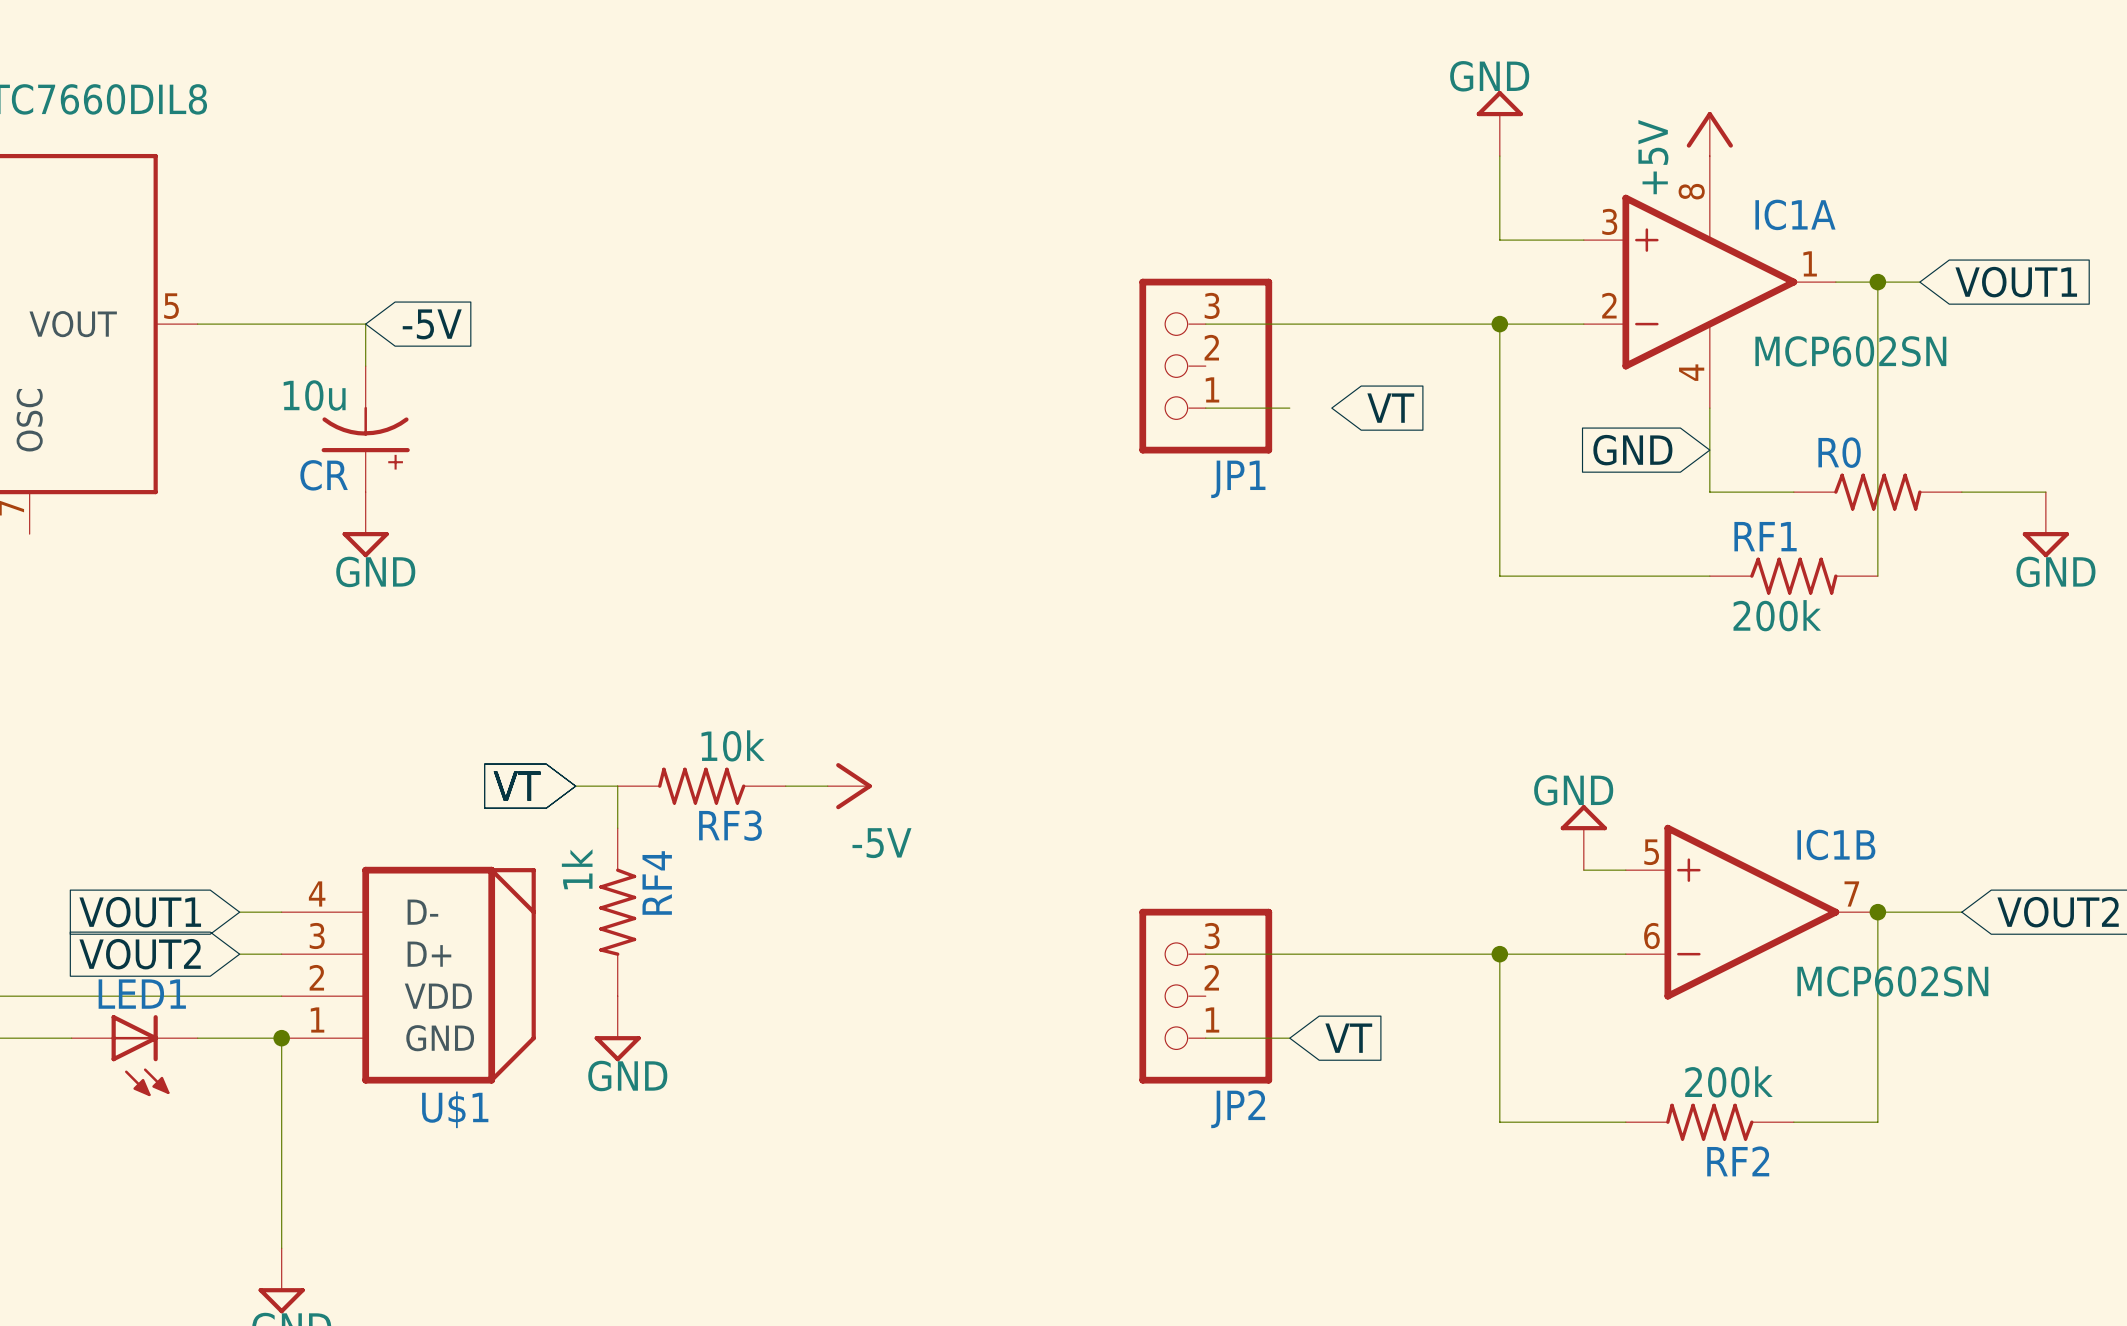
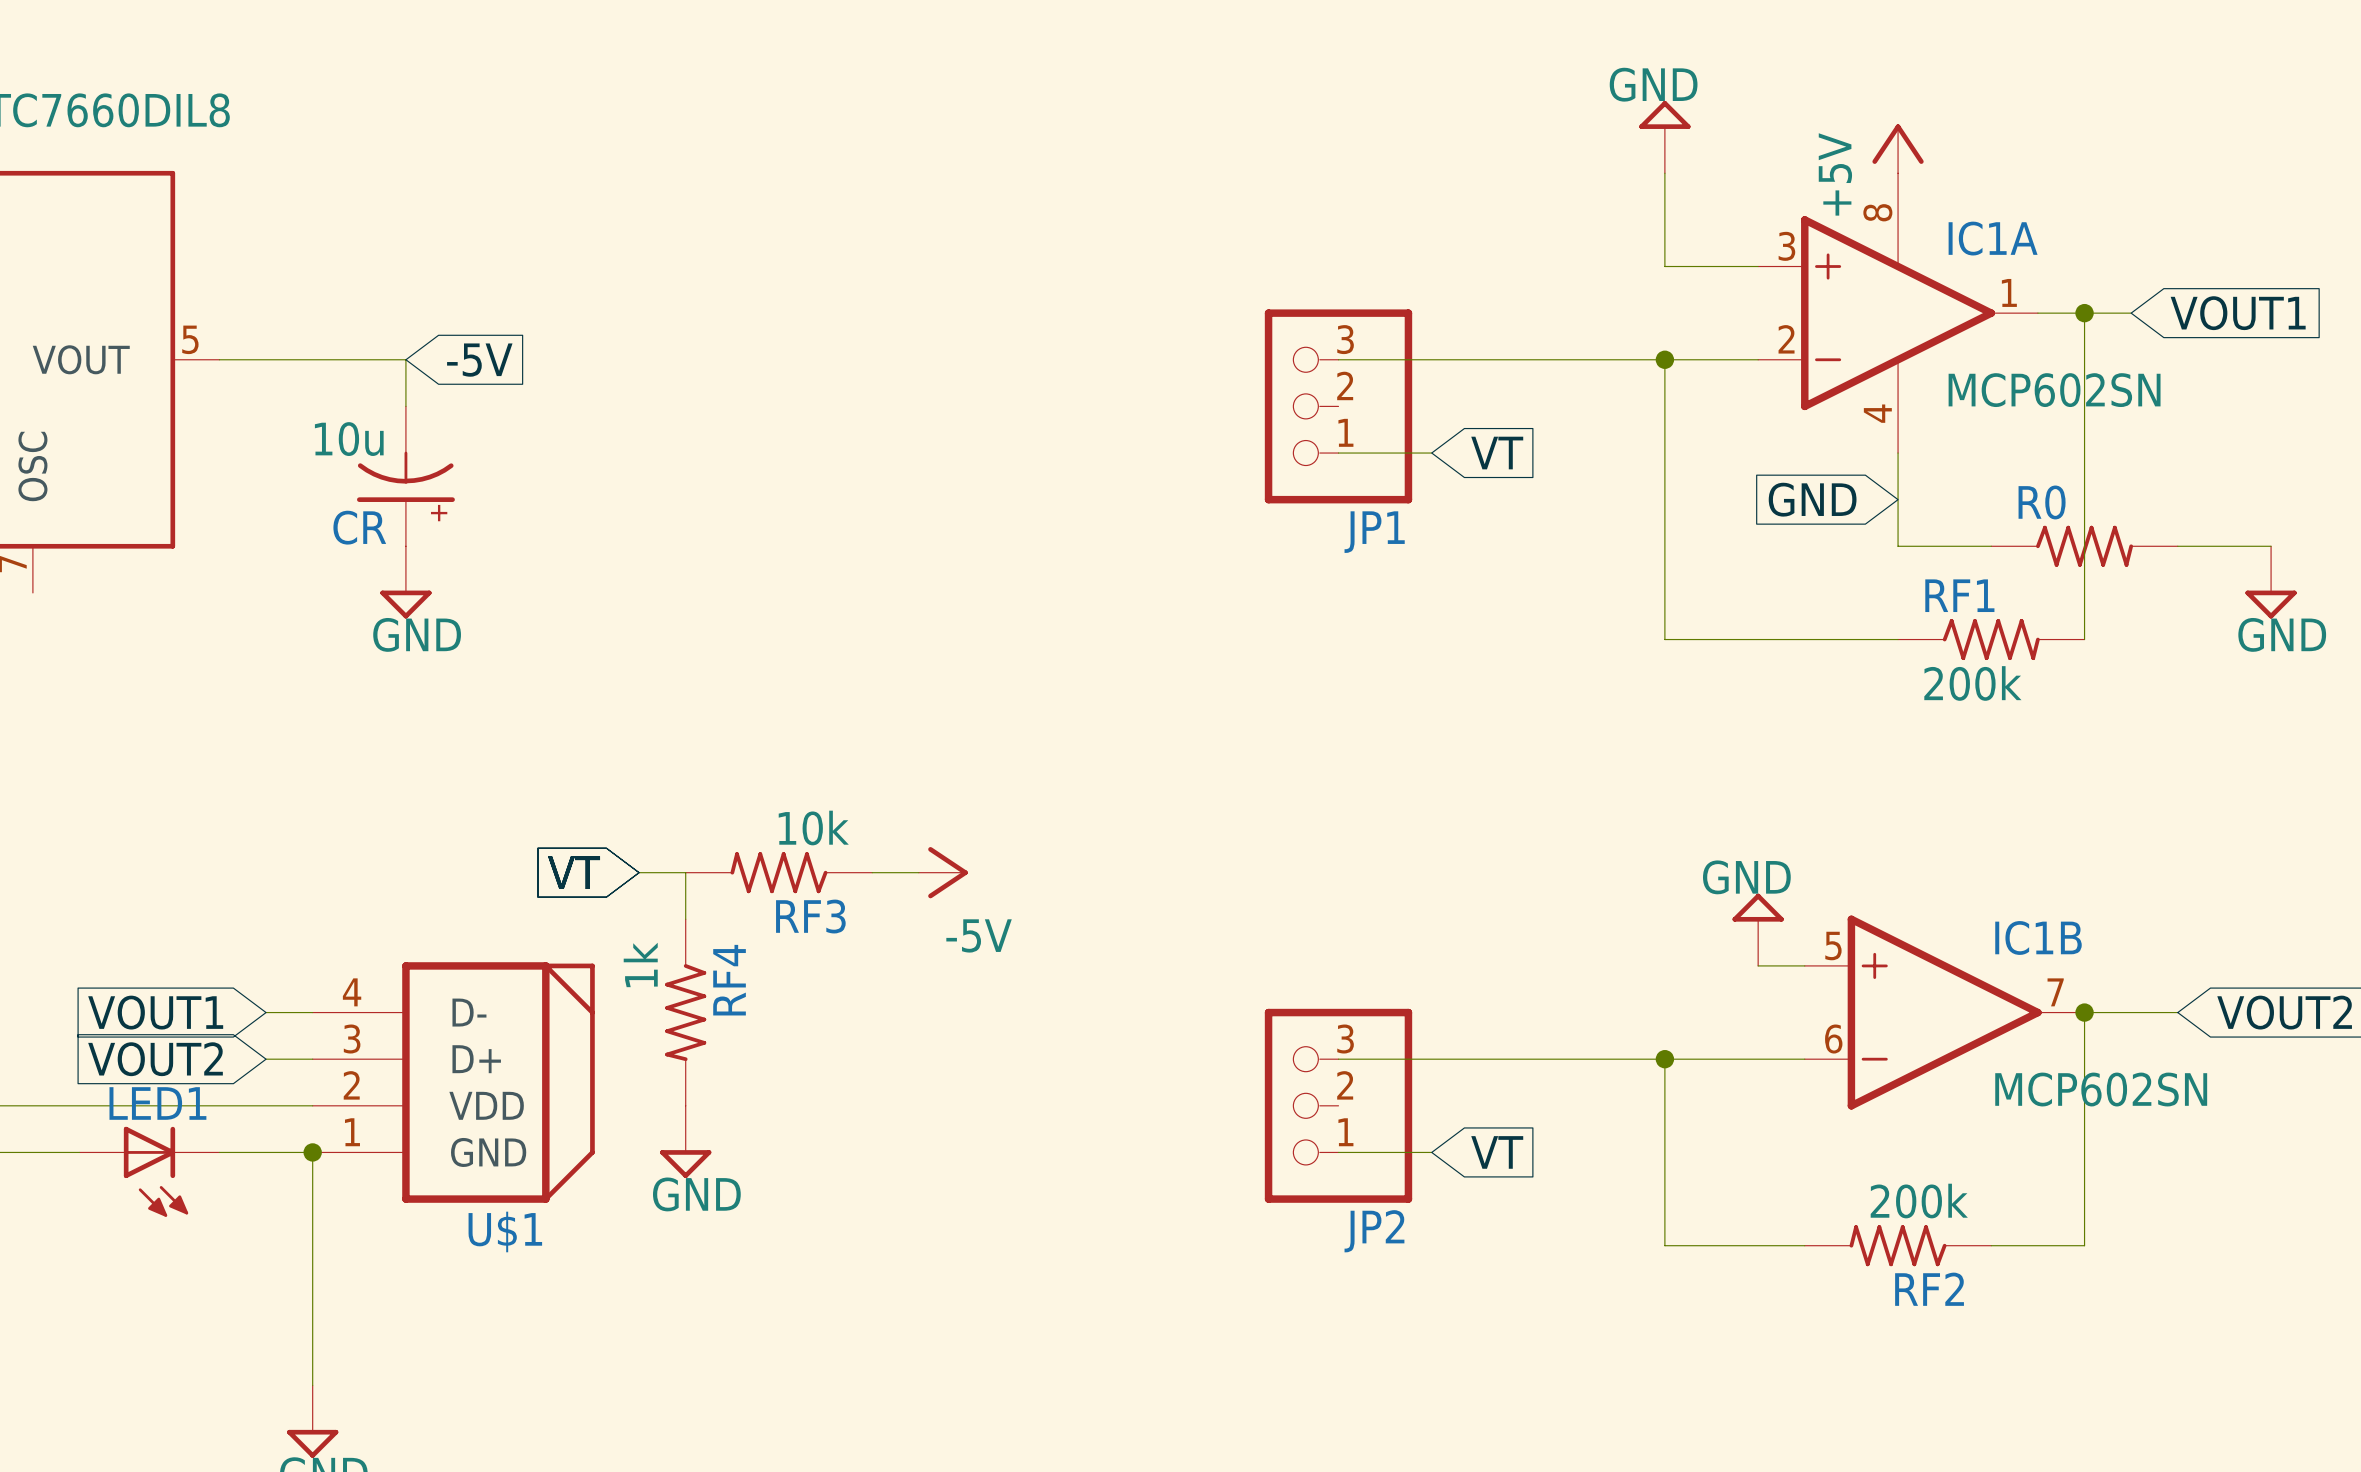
global label position: VT (1390, 408) -> VT (1497, 453)

